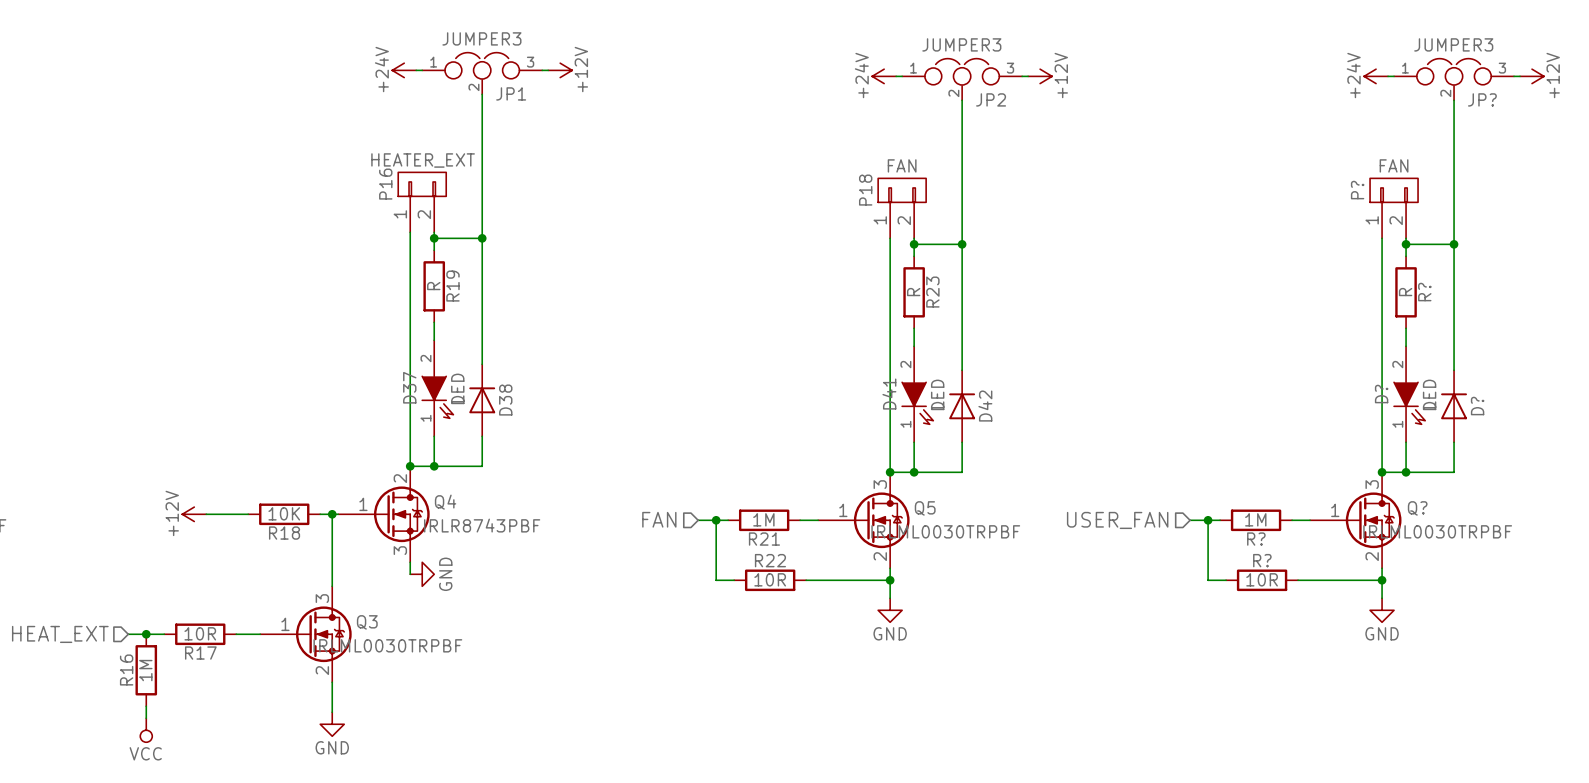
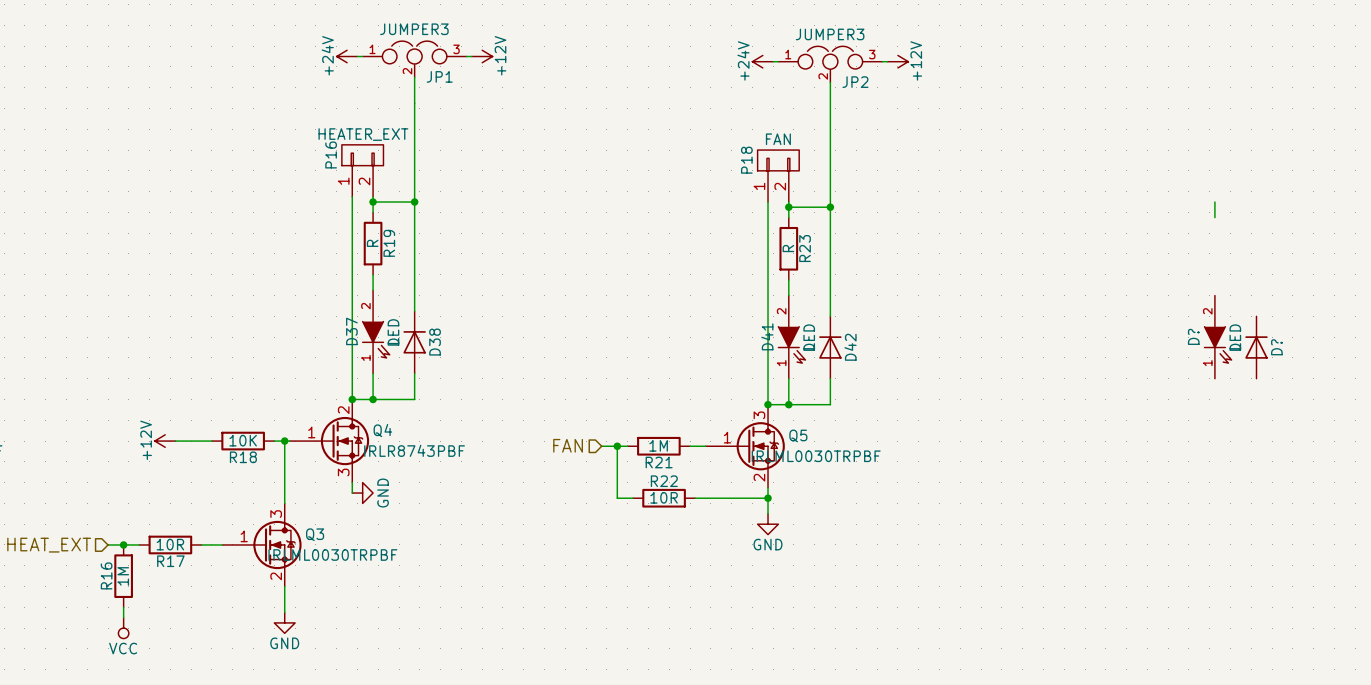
power symbol: +24V (1376, 76) -> none
wire: (1388, 76) (1394, 76) -> none
wire: (1514, 76) (1520, 76) -> none
power symbol: +12V (1532, 76) -> none
JP?: JUMPER3 (1454, 79) -> none
wire: (1454, 100) (1454, 370) -> none
P?: FAN (1394, 208) -> none
wire: (1382, 238) (1382, 472) (1454, 472) (1454, 442) -> none
wire: (1406, 244) (1454, 244) -> none
junction: (1406, 244) -> none
junction: (1454, 244) -> none
R?: R (1406, 292) -> none
wire: (1406, 328) (1406, 346) -> none
wire: (1406, 442) (1406, 472) -> none
junction: (1382, 472) -> none
junction: (1406, 472) -> none
hierarchical label: USER_FAN (1117, 520) -> none
wire: (1190, 520) (1220, 520) -> none
wire: (1208, 520) (1208, 580) (1226, 580) -> none
junction: (1208, 520) -> none
R?: 1M (1256, 520) -> none
wire: (1292, 520) (1310, 520) -> none
Q?: IRLML0030TRPBF (1355, 520) -> none
wire: (1382, 568) (1382, 598) -> none
R?: 10R (1262, 580) -> none
wire: (1298, 580) (1382, 580) -> none
junction: (1382, 580) -> none
power symbol: GND (1382, 610) -> none

